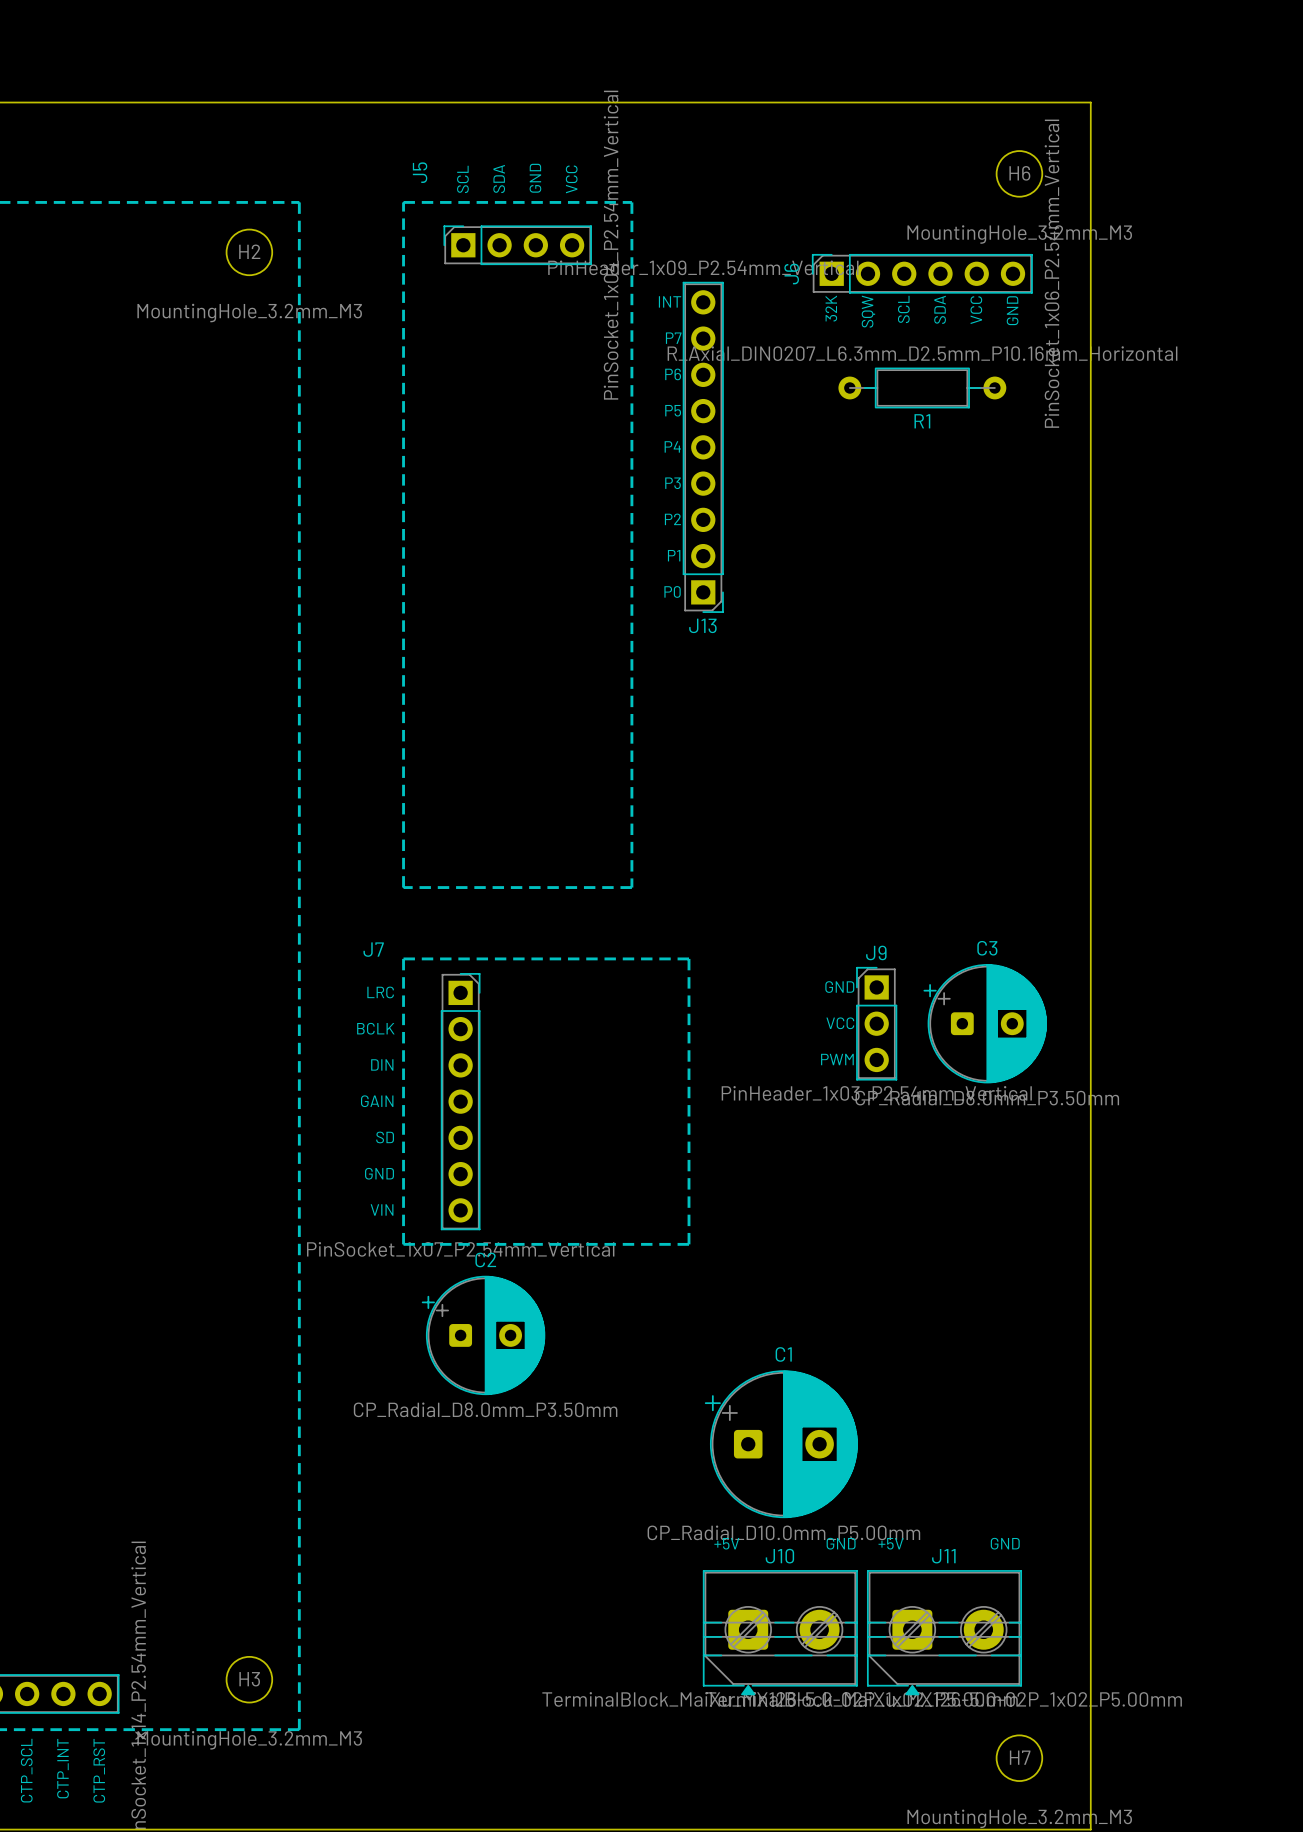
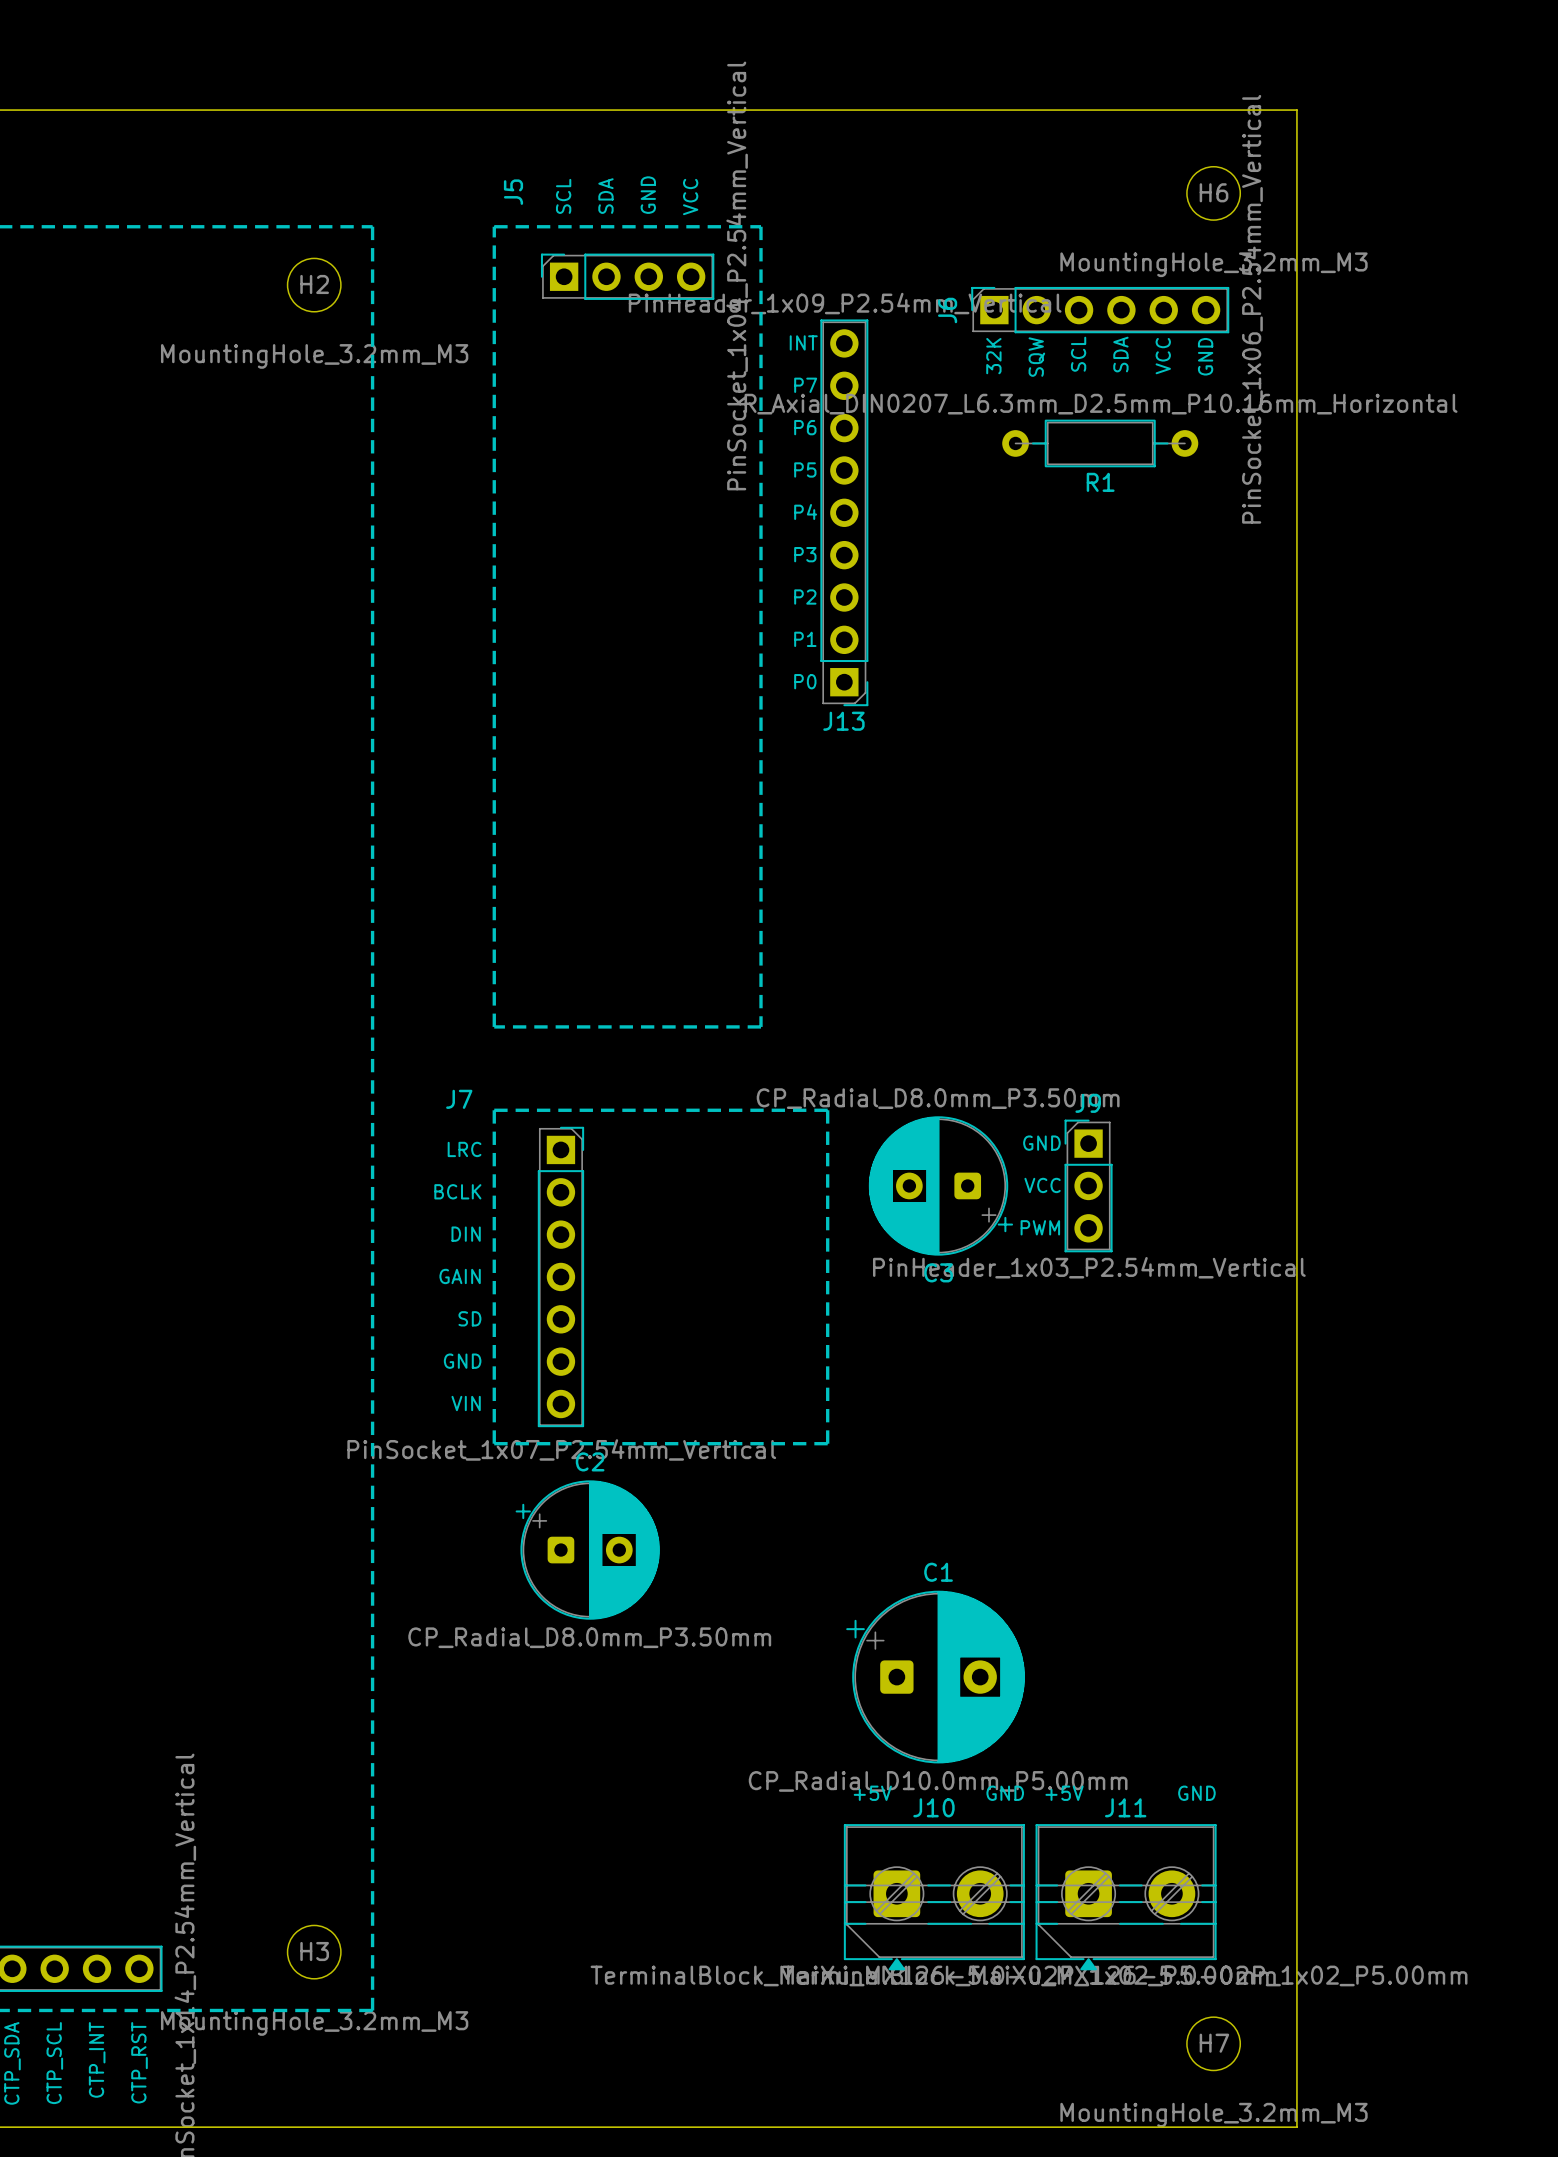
text position: GND (839, 987) -> GND (1041, 1143)
text position: VCC (840, 1023) -> VCC (1042, 1185)
J9 position: (876, 1023) -> (1088, 1185)
C3 rotation: 0° (985, 1023) -> 180° (940, 1185)
C3 position: (985, 1023) -> (940, 1185)
text position: PWM (837, 1059) -> PWM (1040, 1227)

